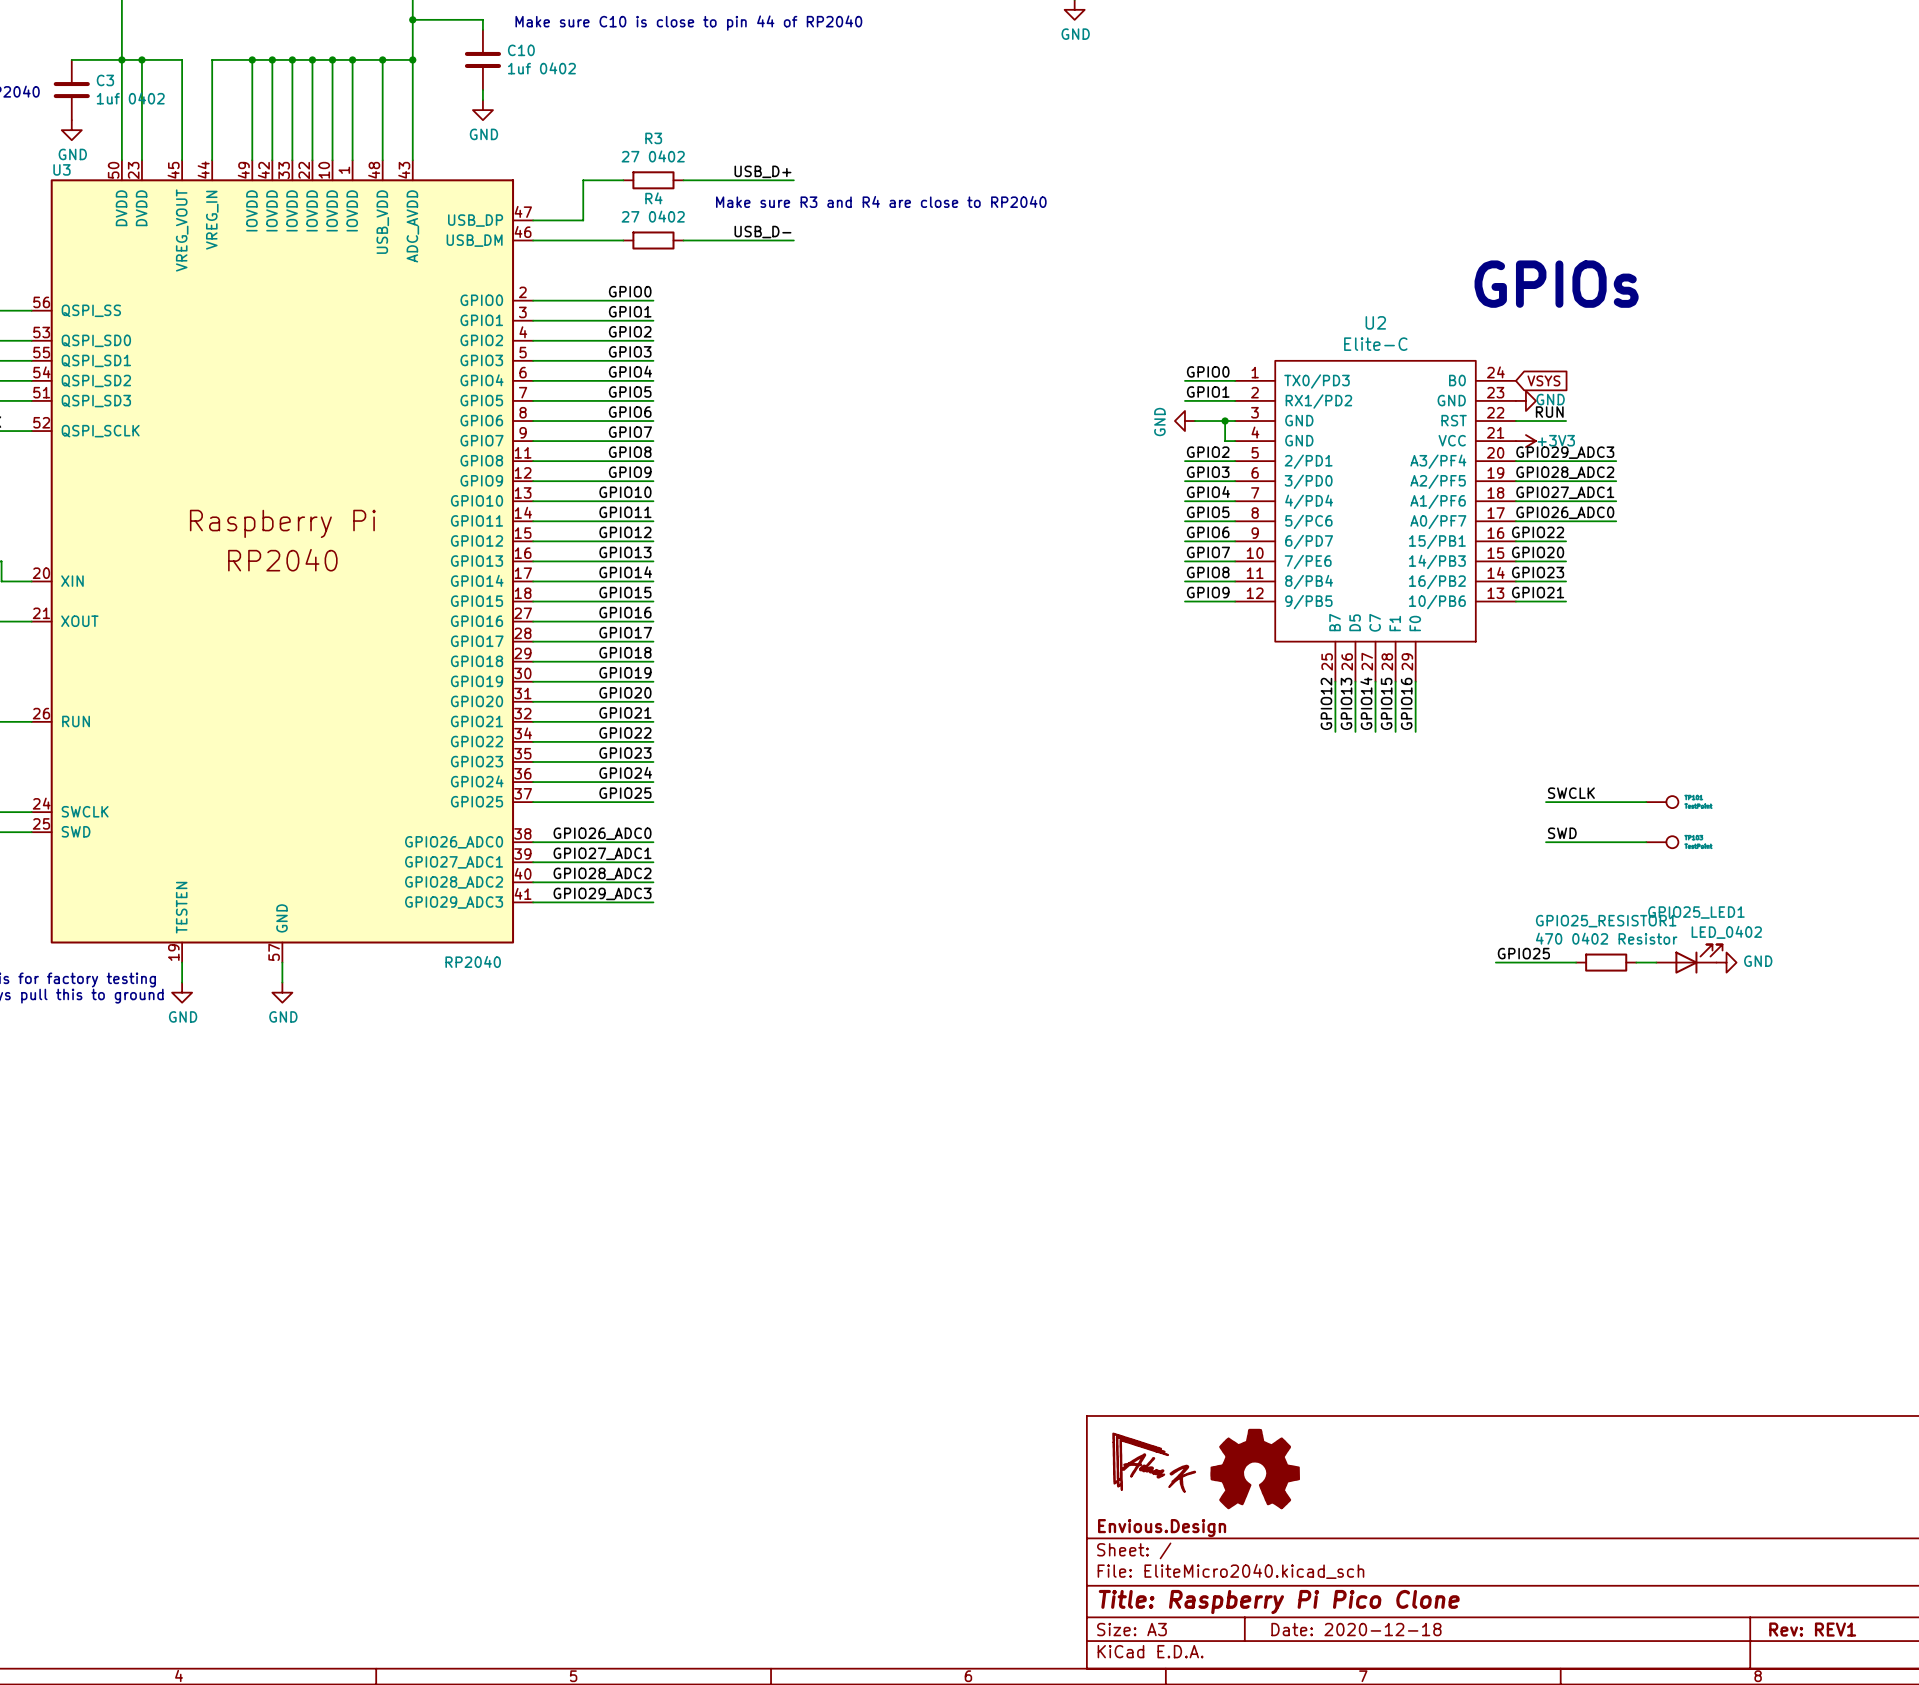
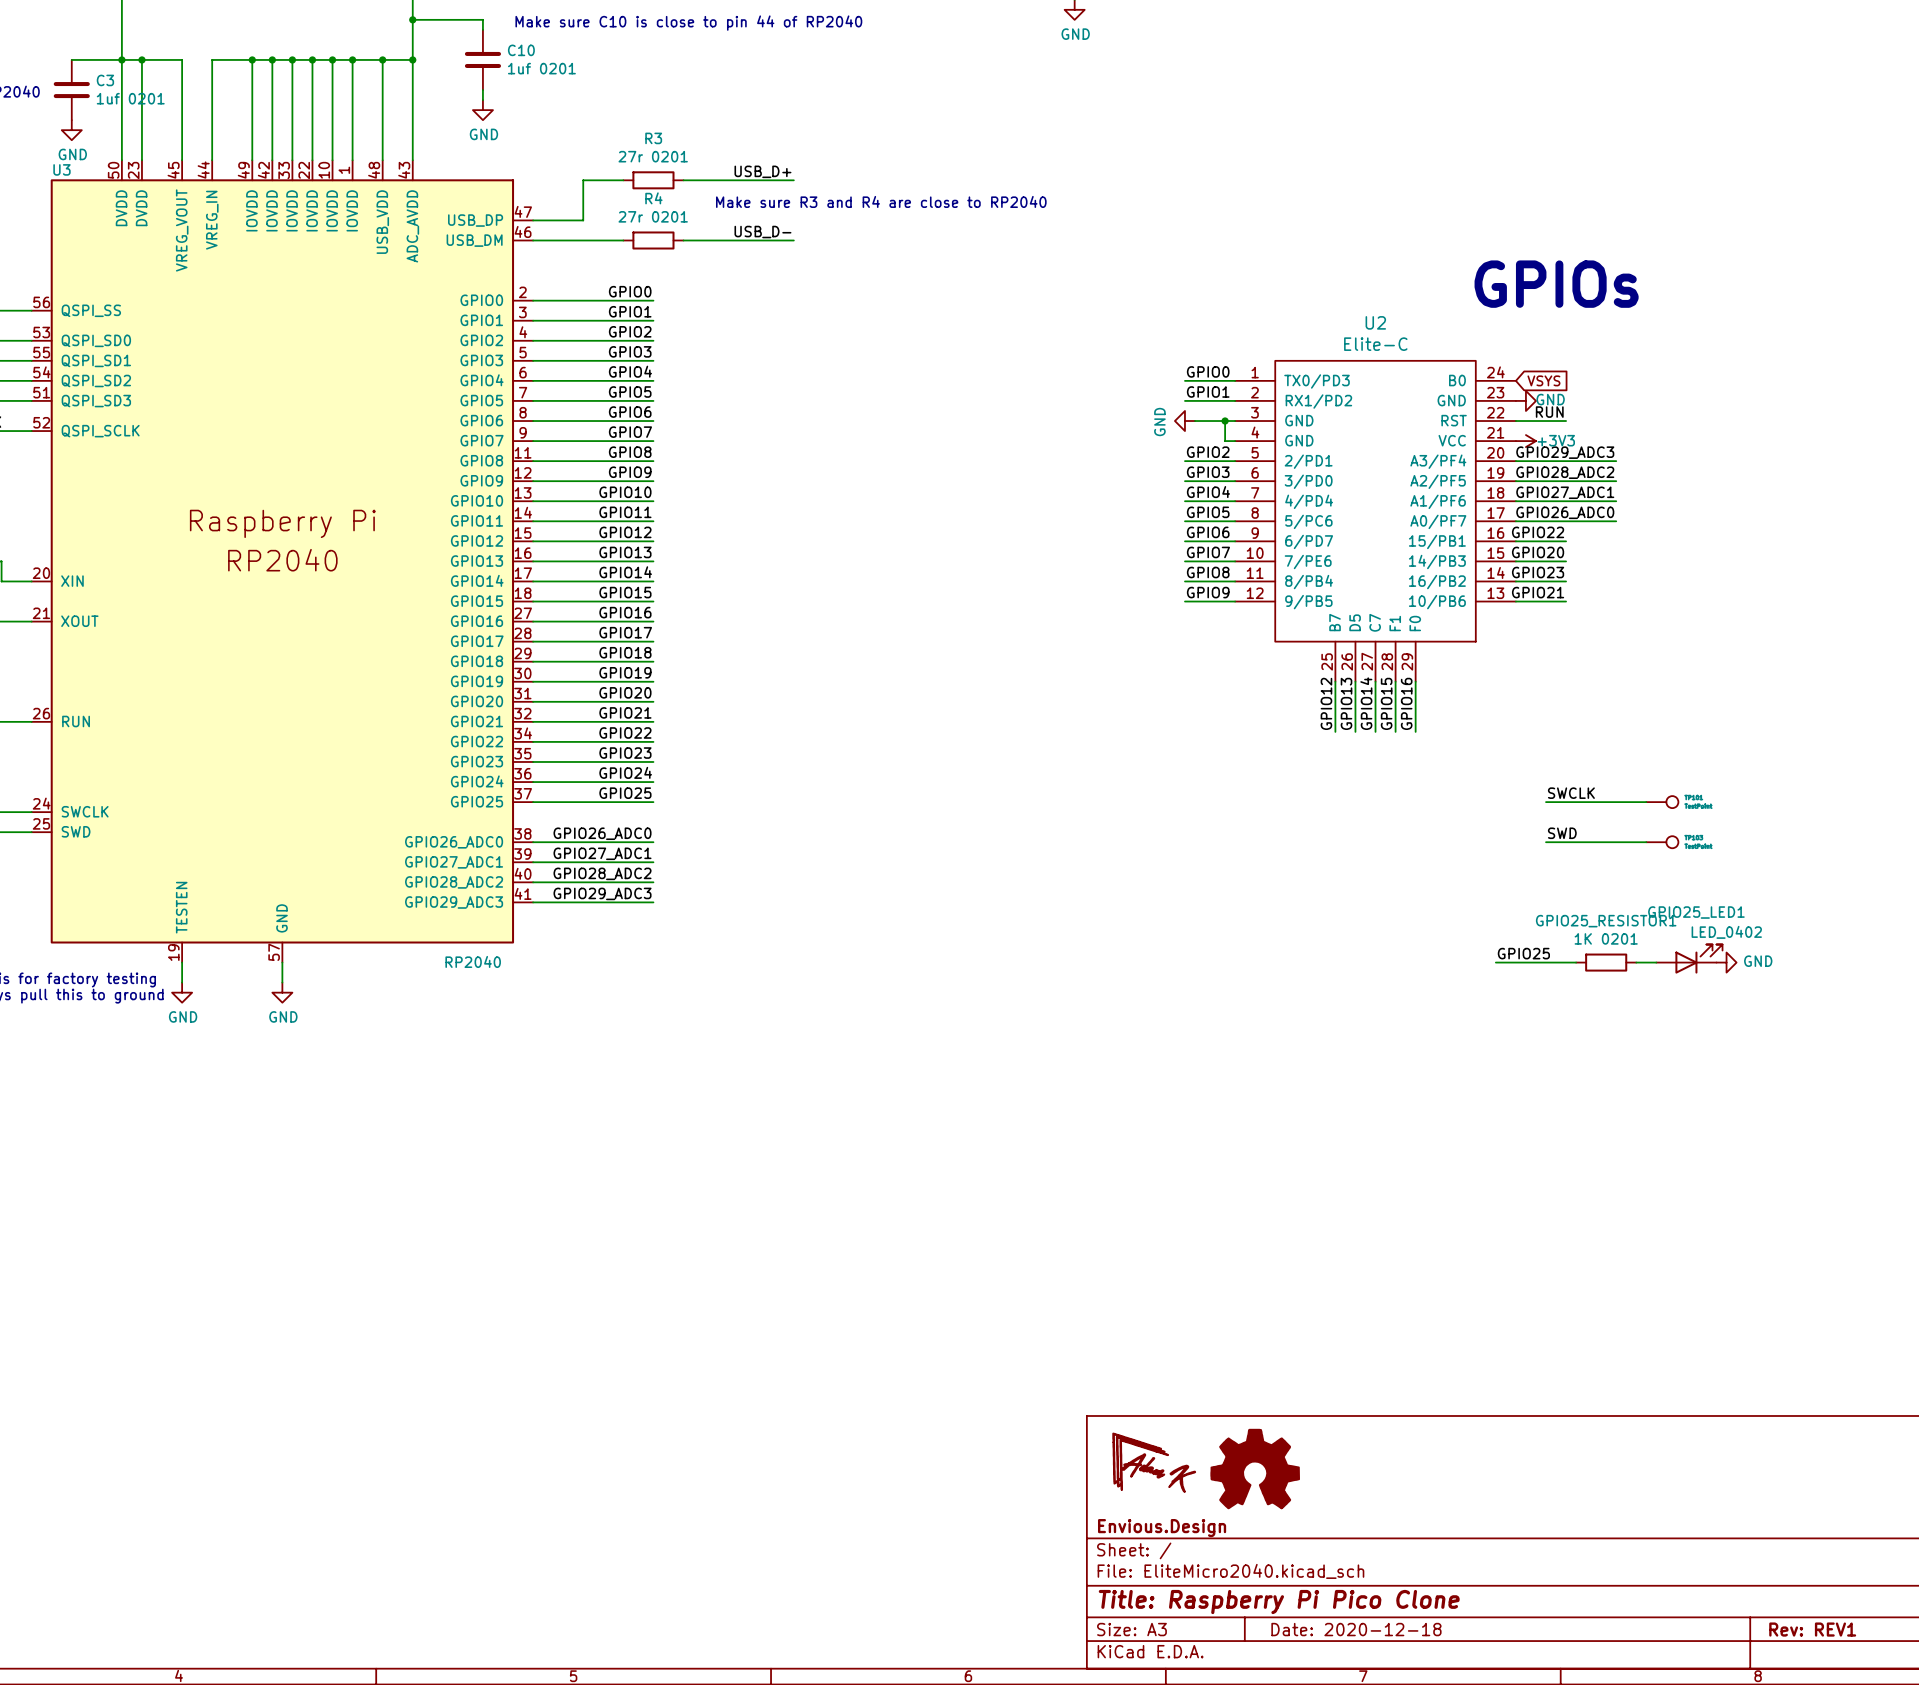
C10 value: 1uf 0402 (541, 68) -> 1uf 0201 (541, 68)
C3 value: 1uf 0402 (130, 98) -> 1uf 0201 (130, 98)
R3 value: 27 0402 (653, 156) -> 27r 0201 (653, 156)
R4 value: 27 0402 (653, 216) -> 27r 0201 (653, 216)
GPIO25_RESISTOR1 value: 470 0402 Resistor (1606, 938) -> 1K 0201 (1606, 938)

